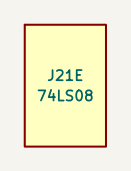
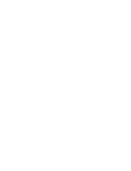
J21E: 74LS08 (65, 85) -> none

